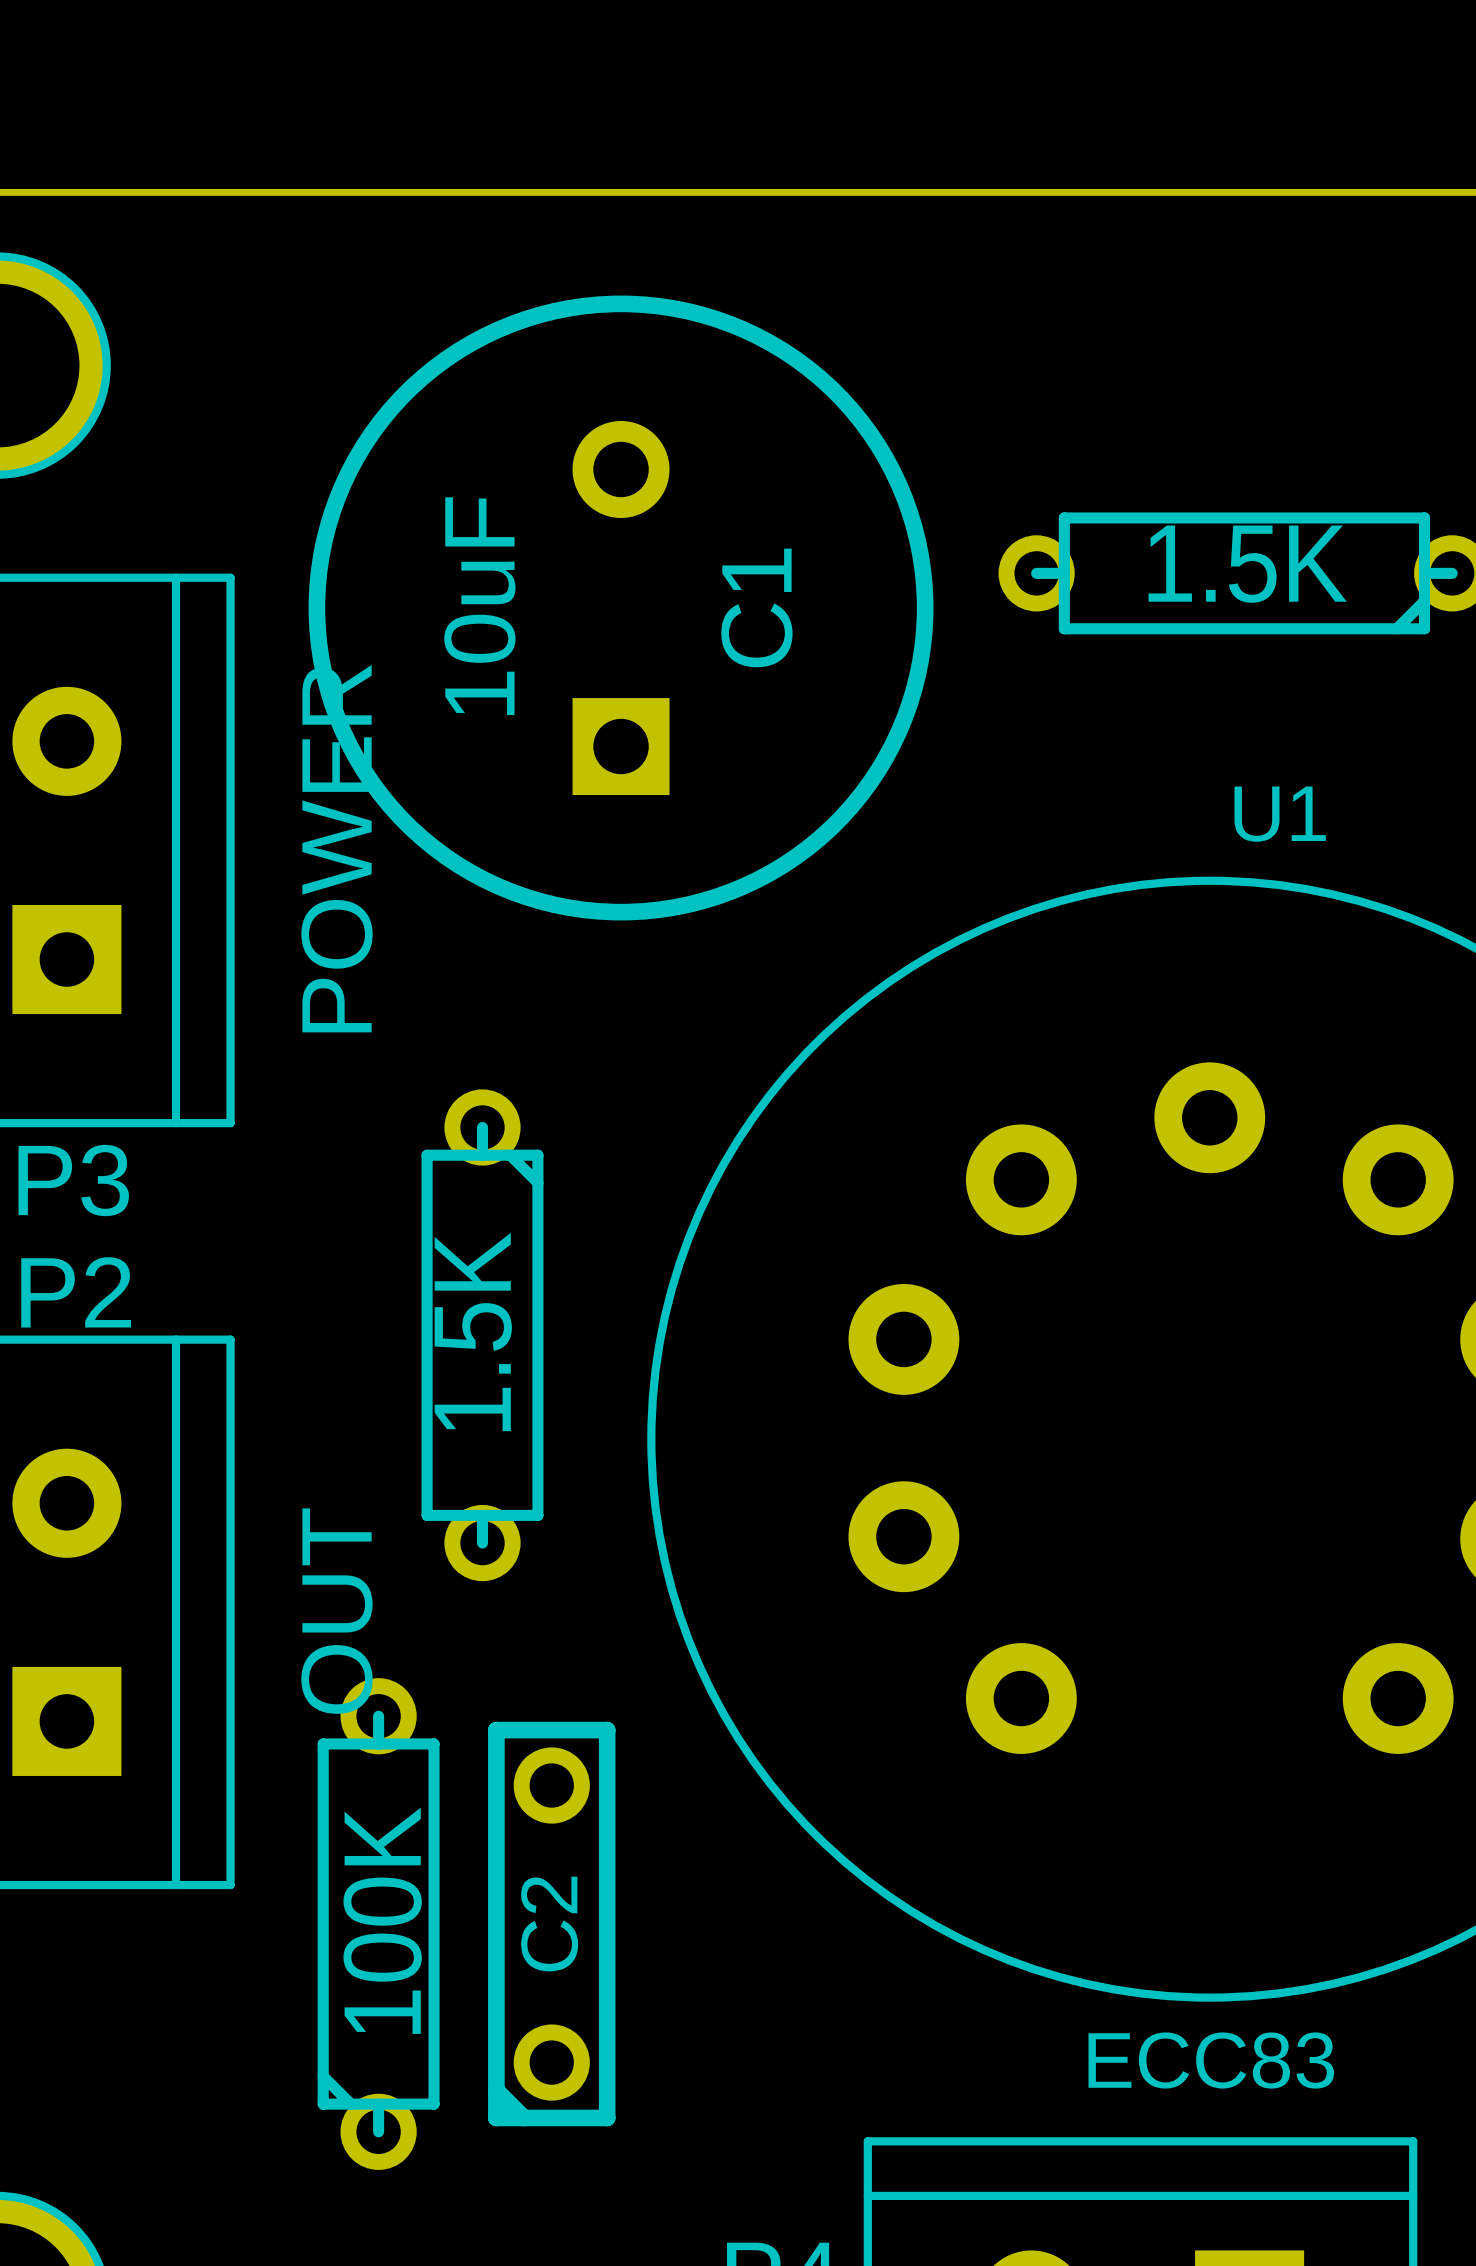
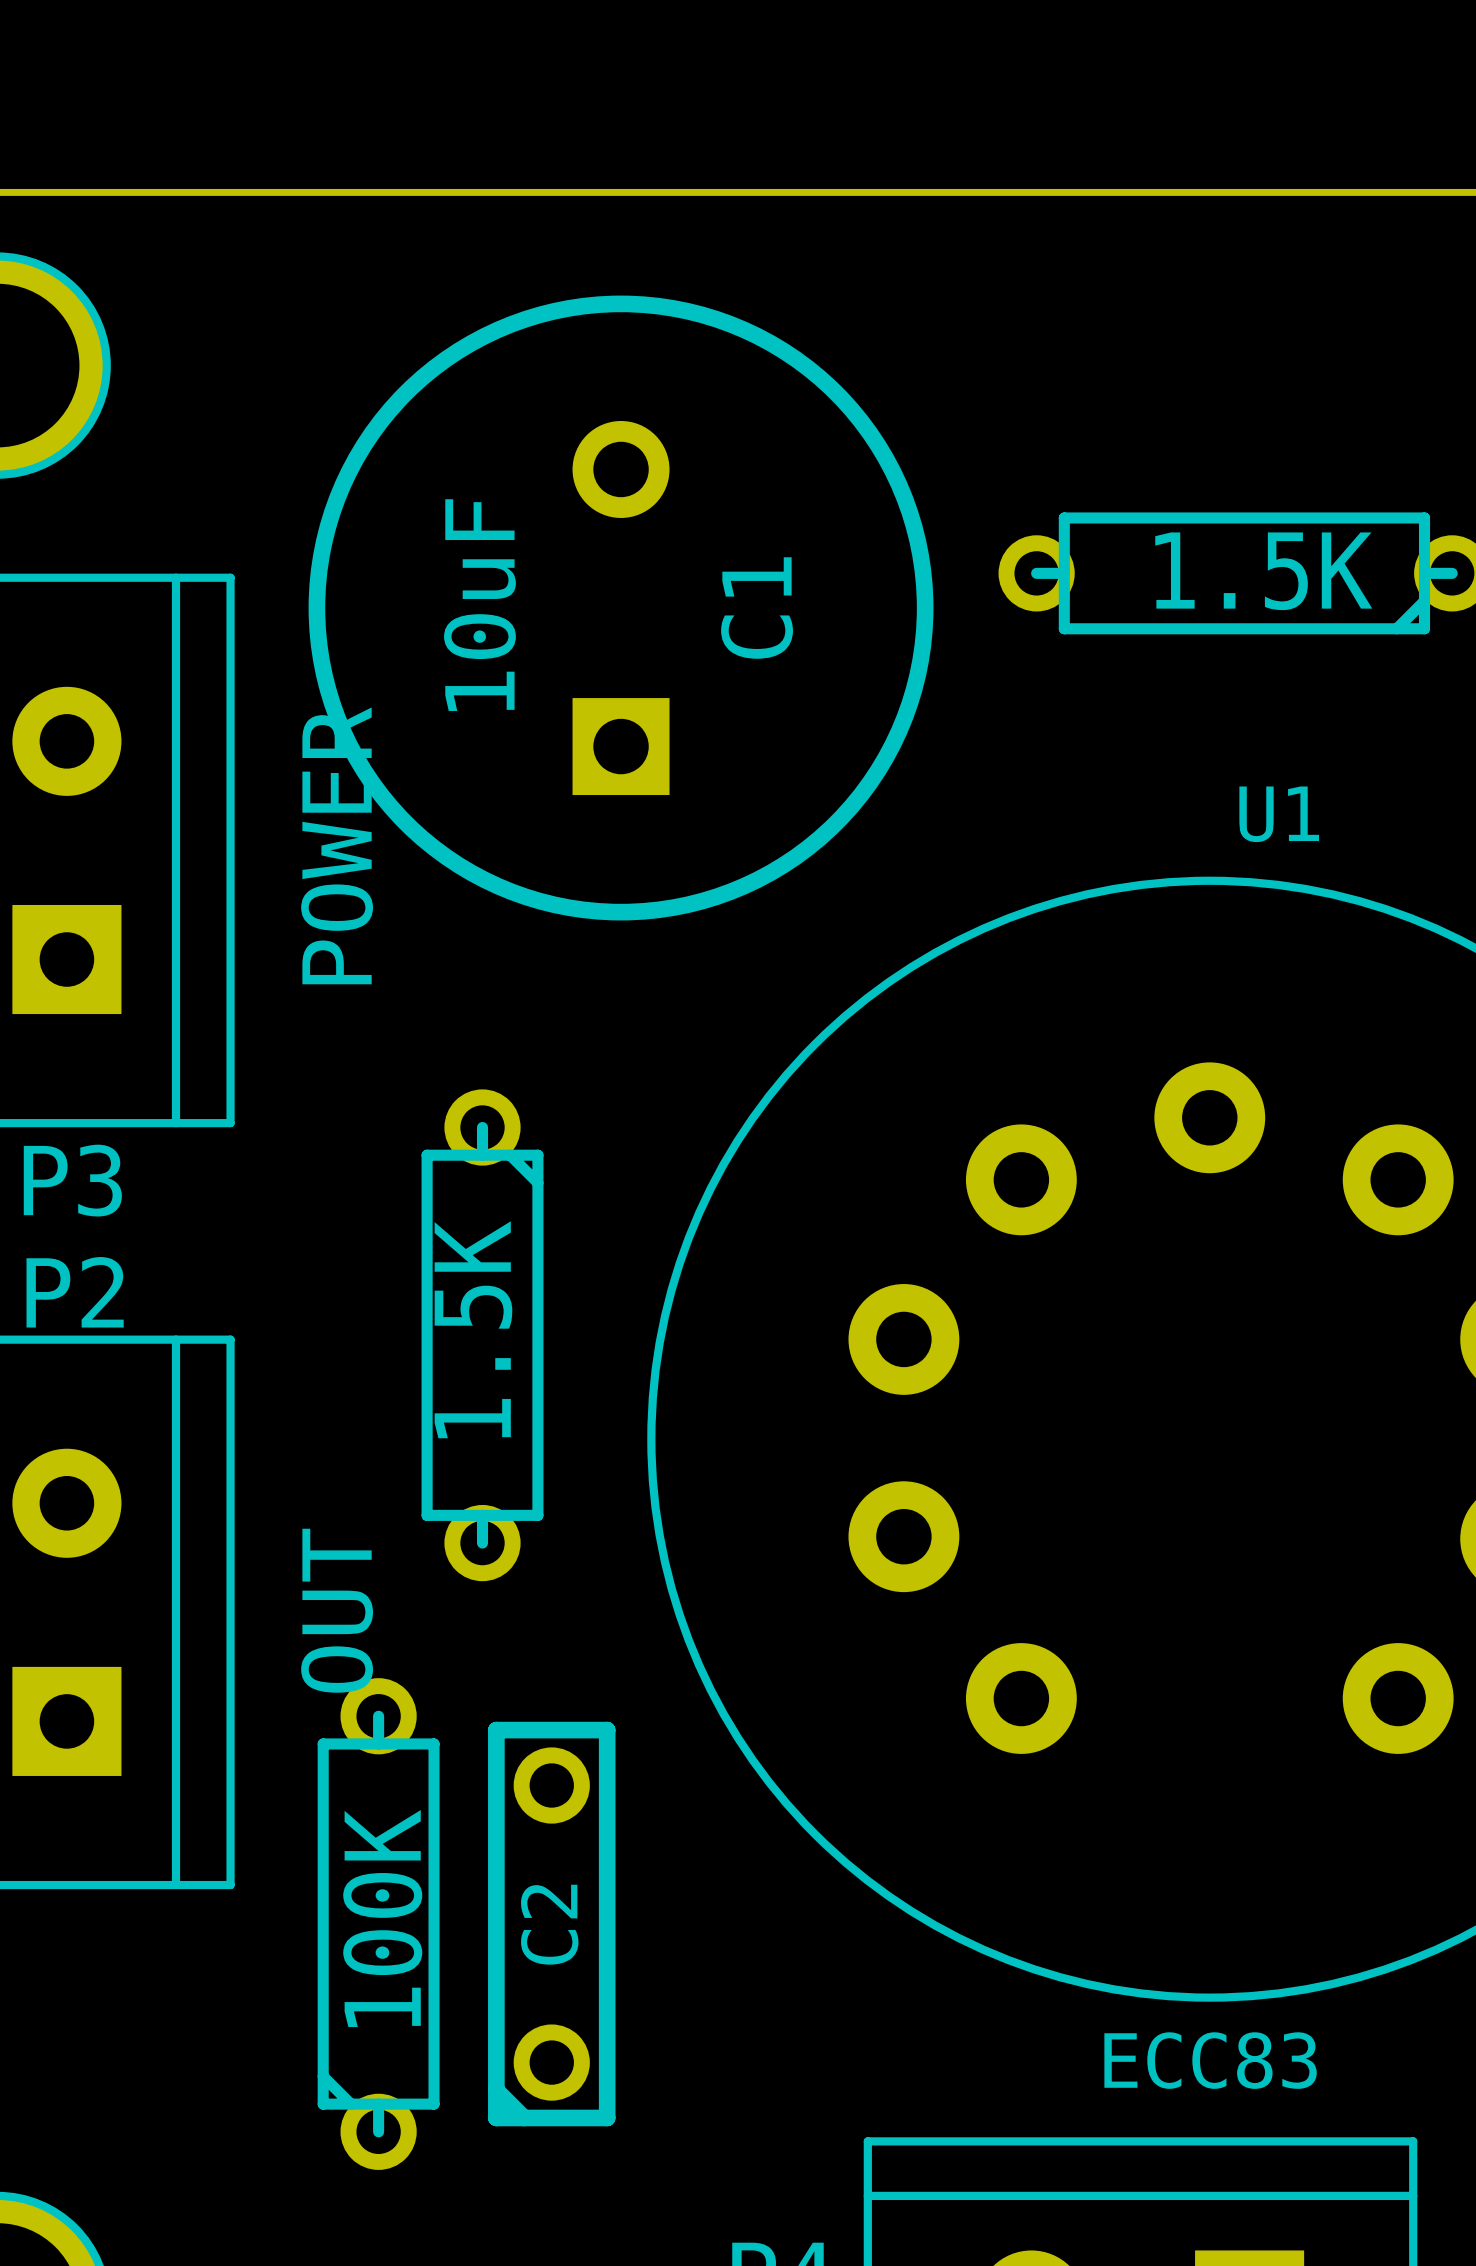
part value position: 1.5K (1247, 564) -> 1.5K (1263, 571)

